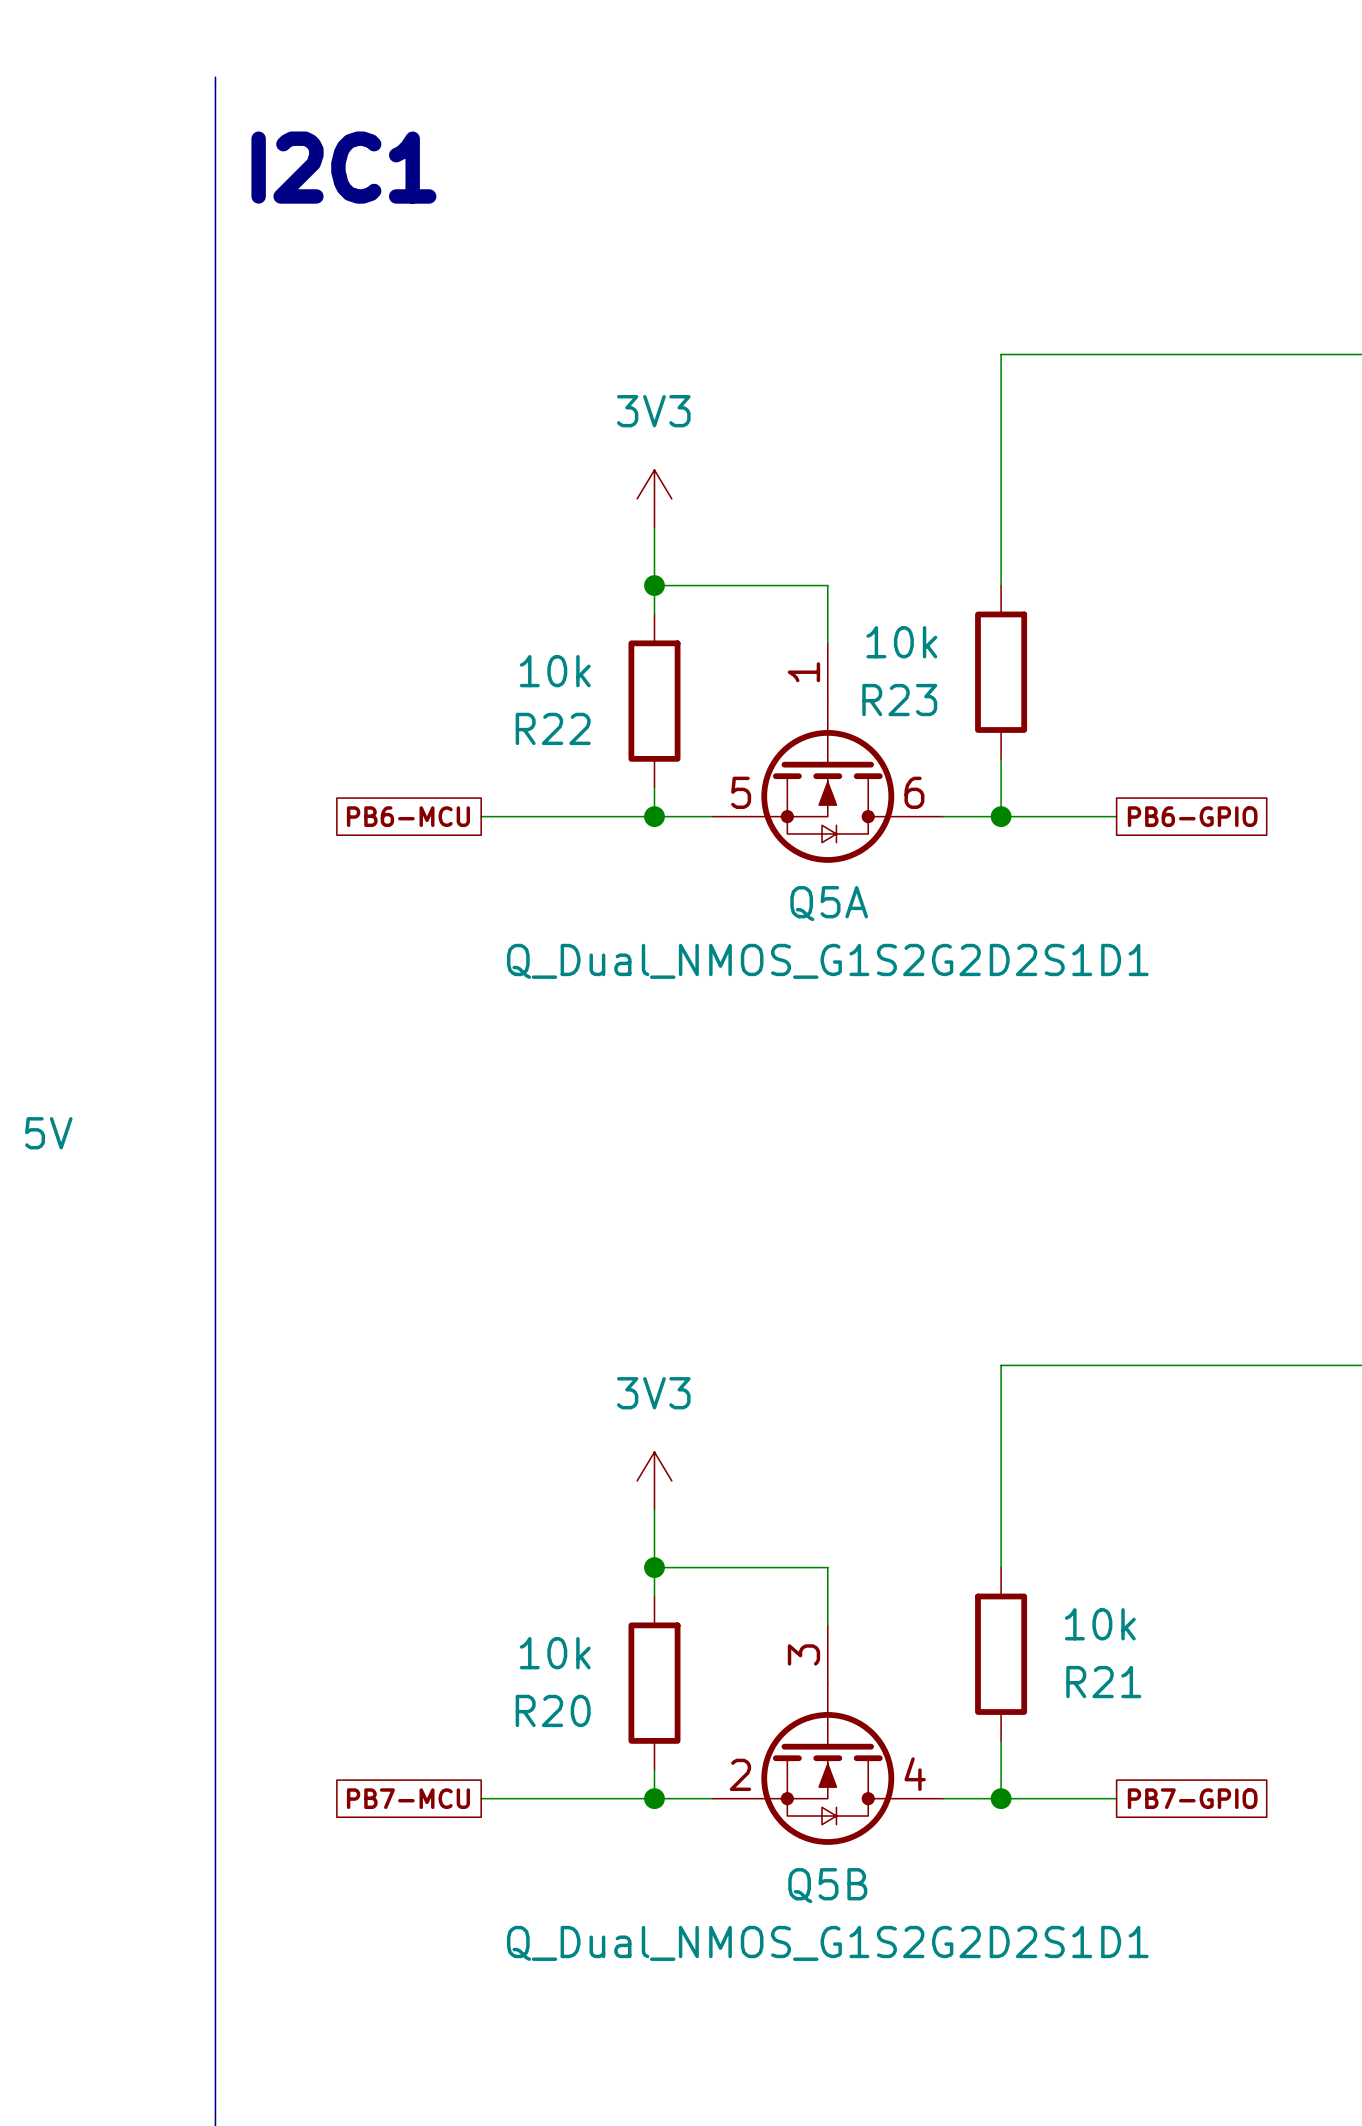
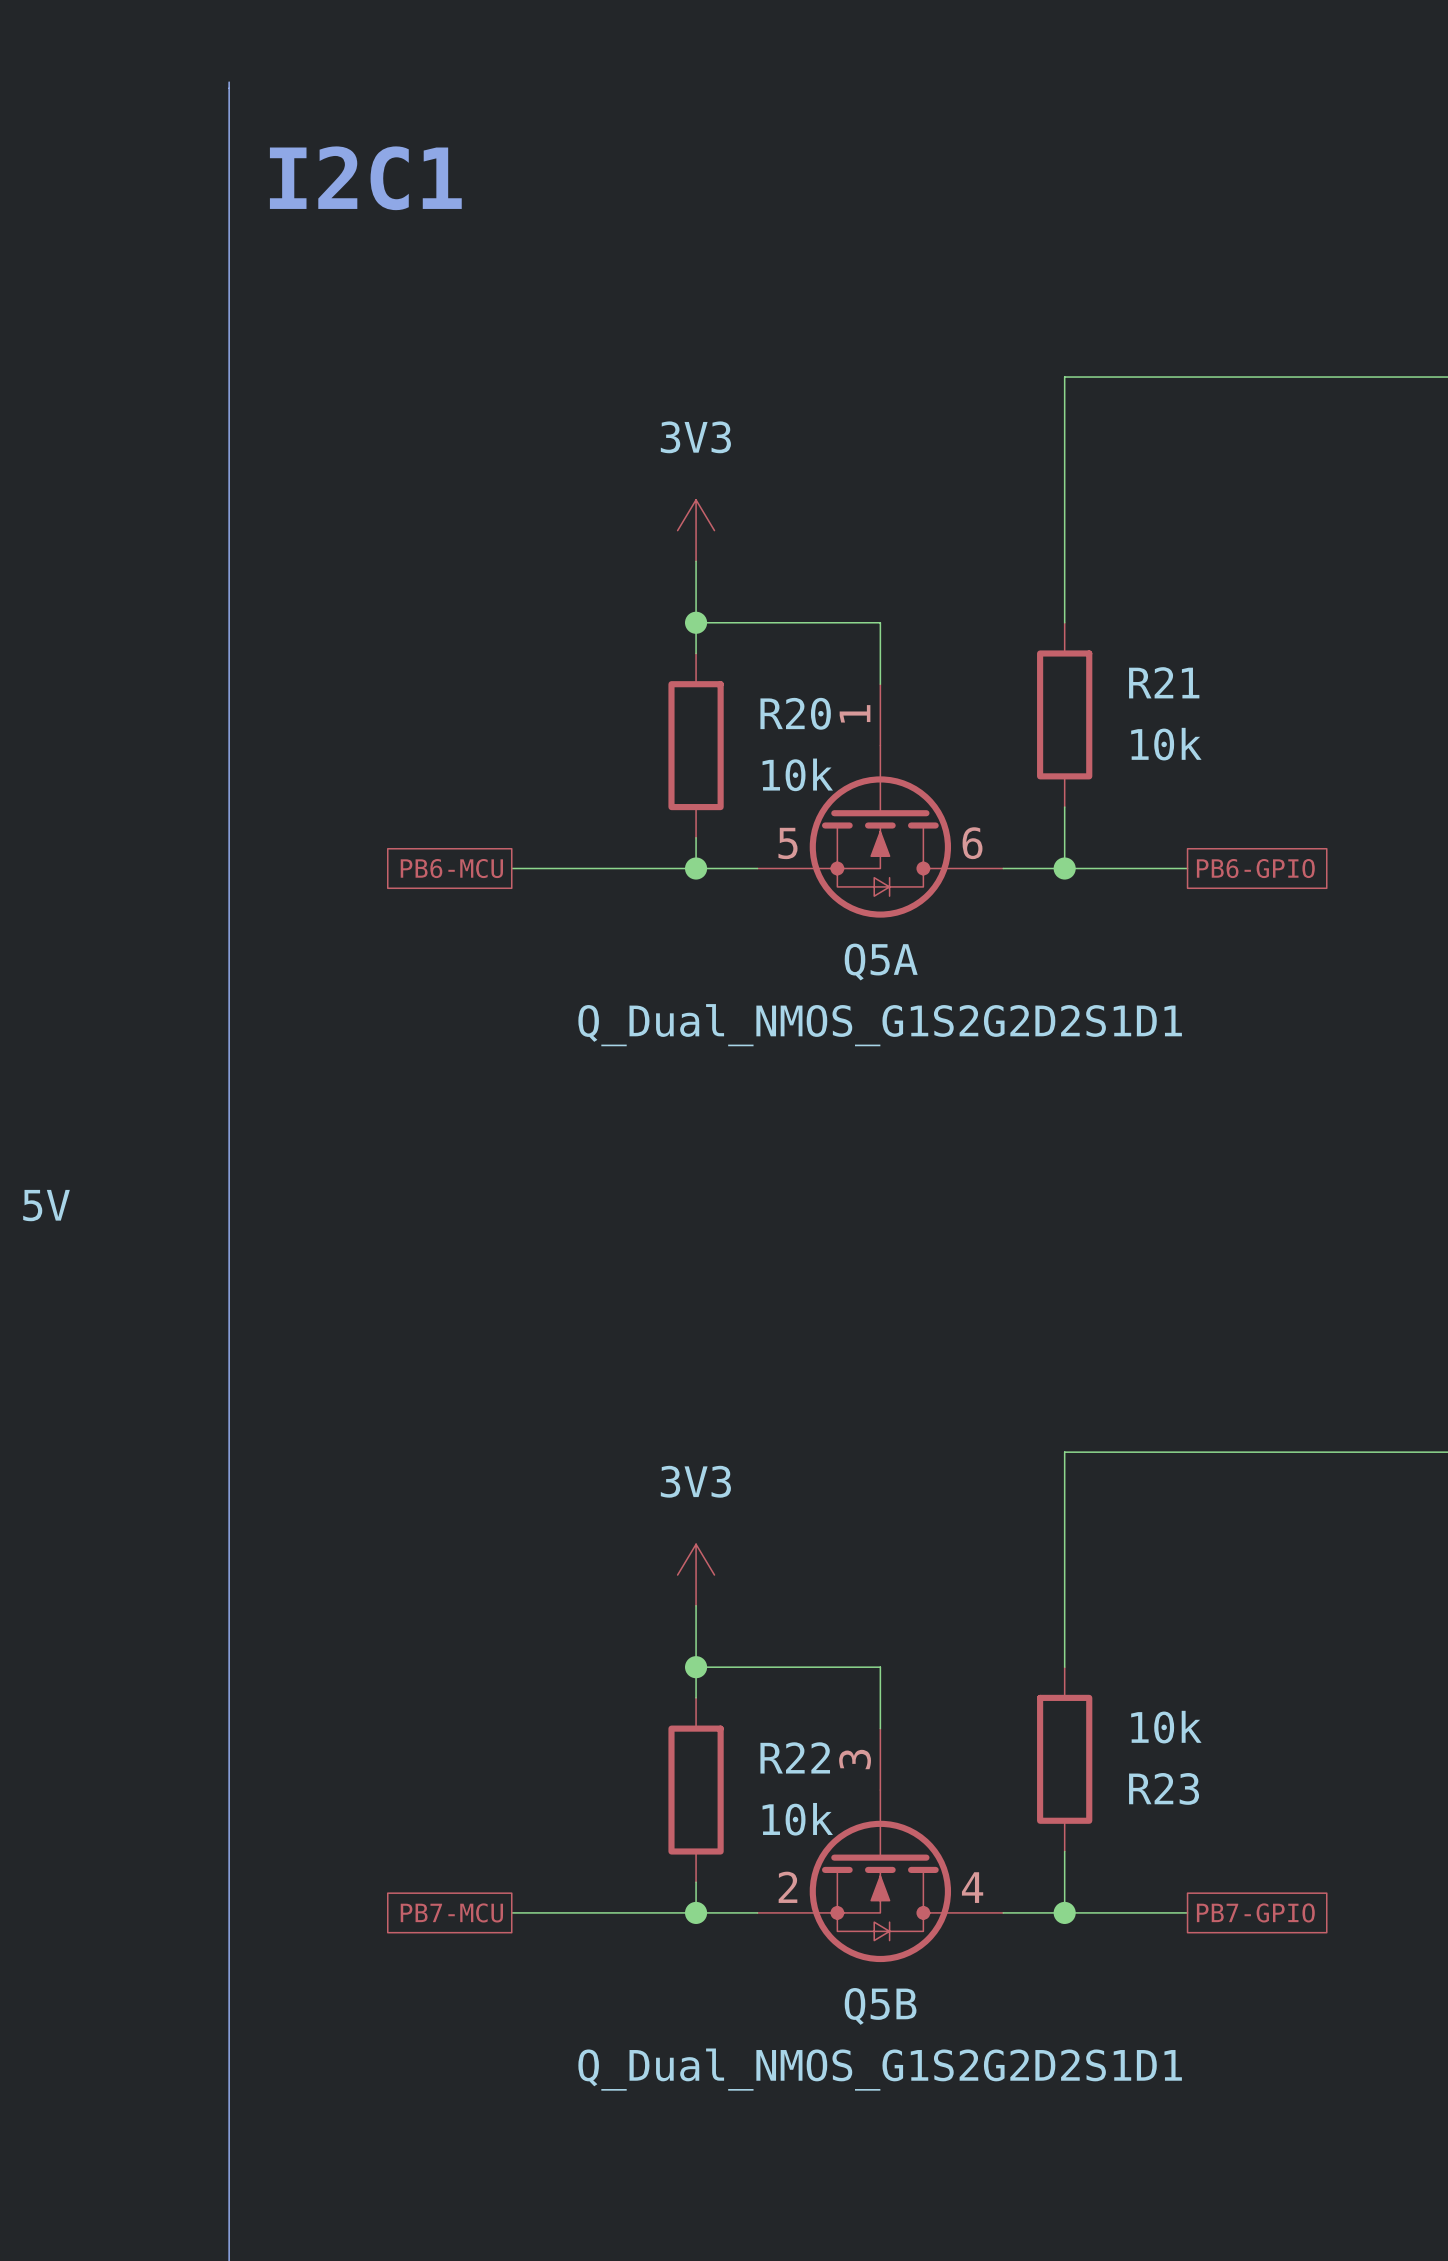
R23 value position: 10k (901, 642) -> 10k (1166, 744)
R22 value position: 10k (555, 671) -> 10k (797, 774)
R23 name: R23 (899, 700) -> R21 (1164, 682)
R22 name: R22 (553, 728) -> R20 (795, 713)
R20 value position: 10k (555, 1653) -> 10k (797, 1819)
R21 name: R21 (1103, 1682) -> R23 (1164, 1788)
R20 name: R20 (553, 1710) -> R22 (795, 1757)

